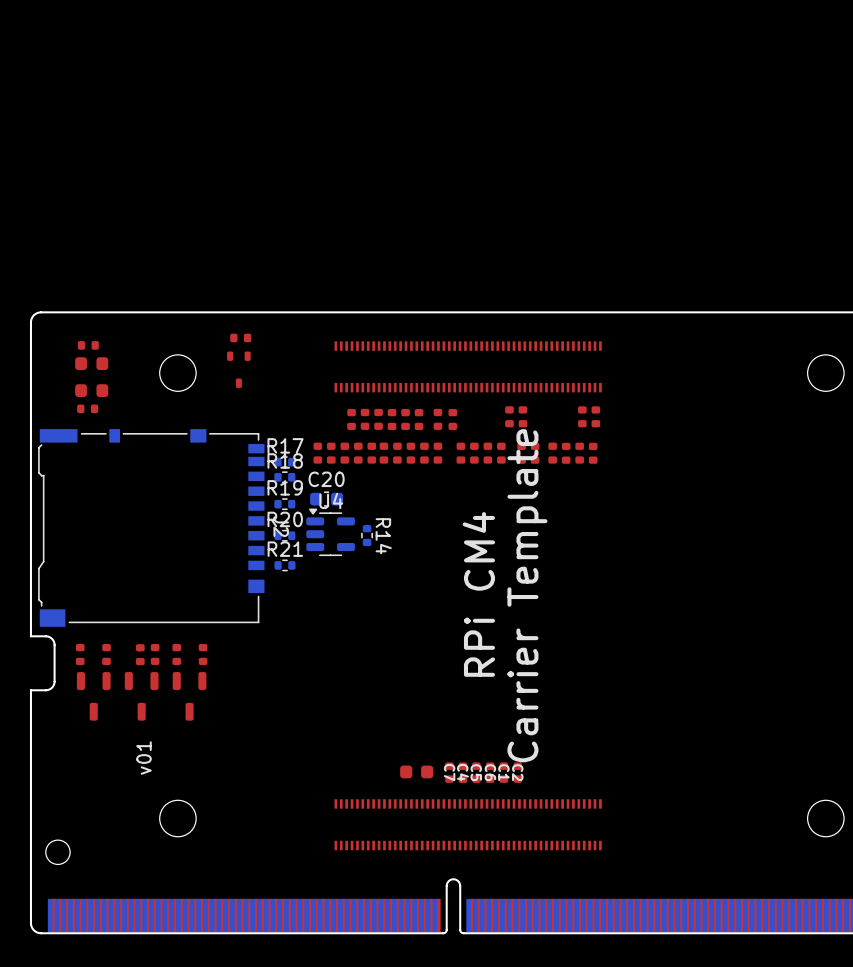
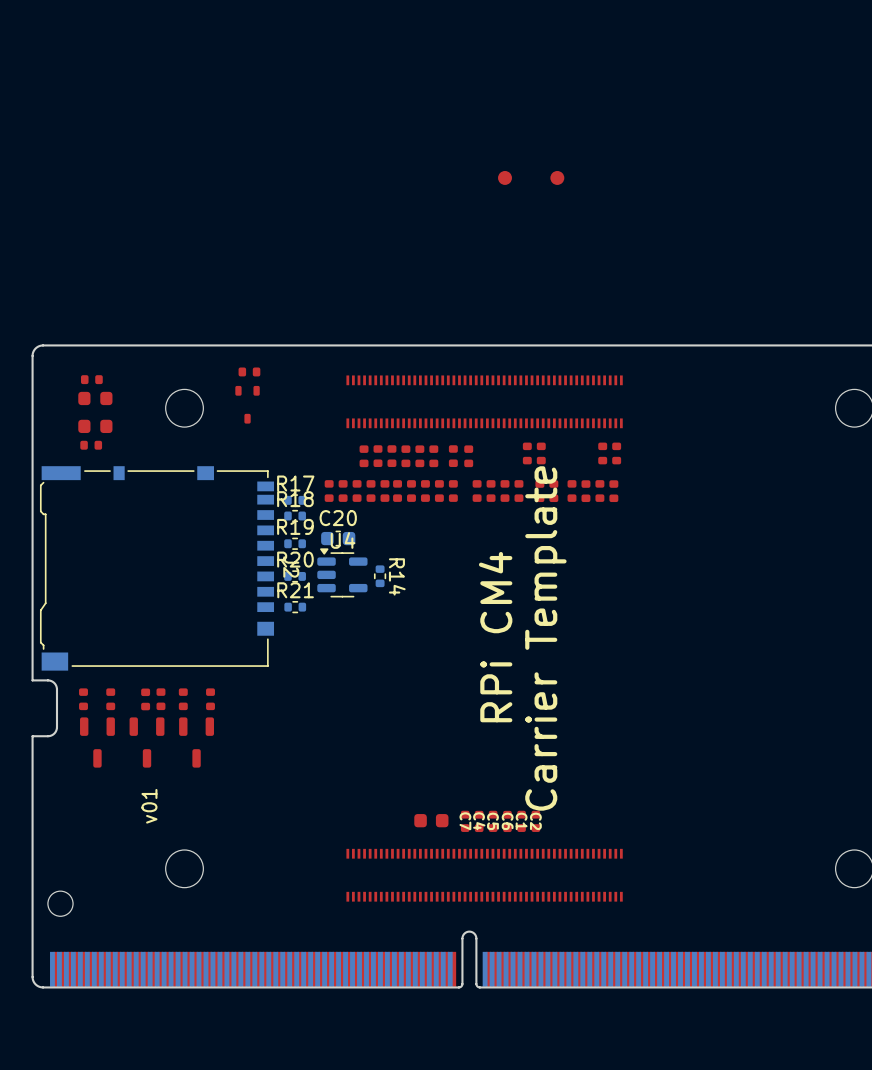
part: none -> (505, 177)
part: none -> (557, 177)

